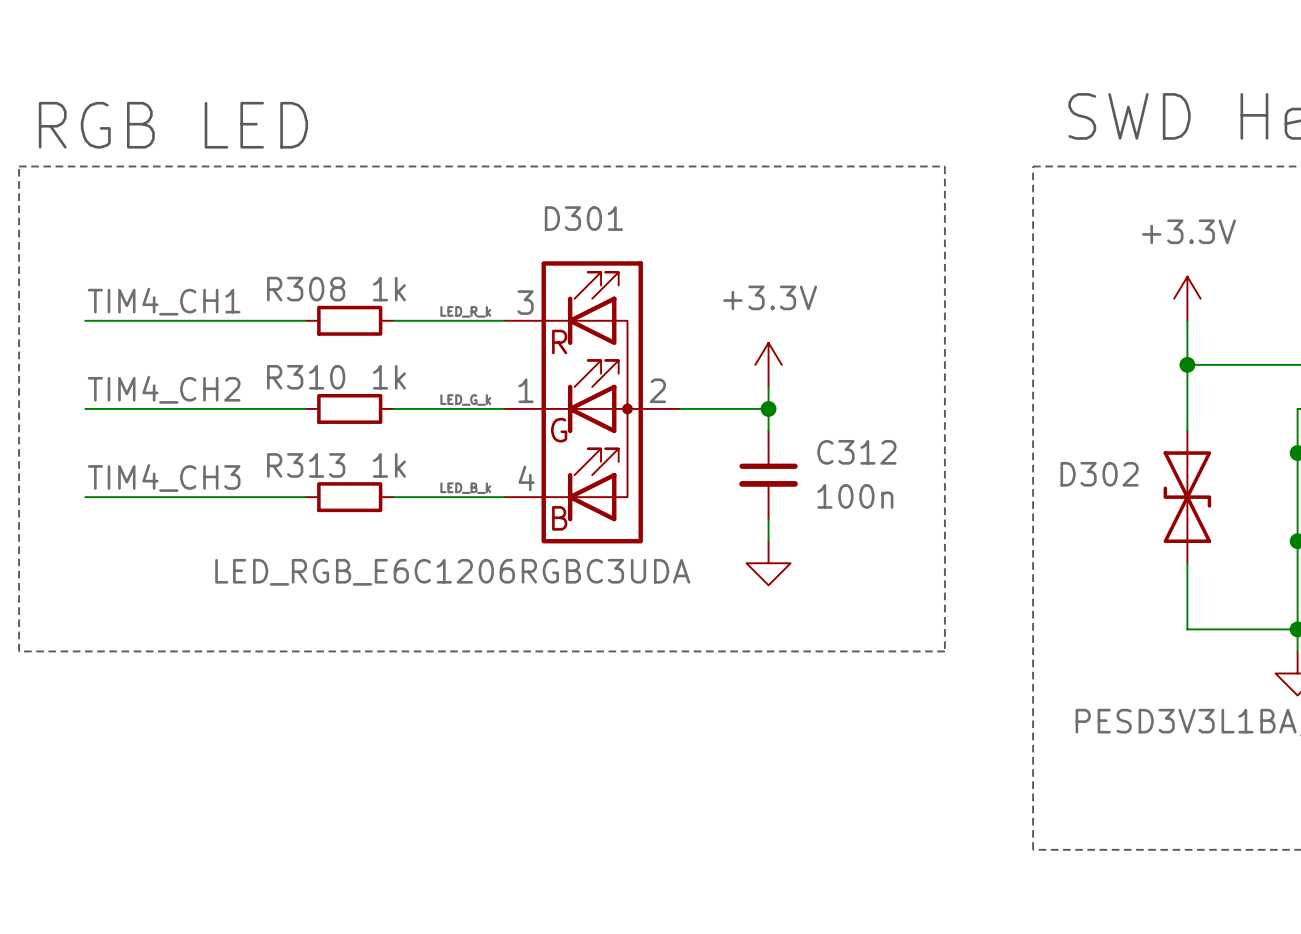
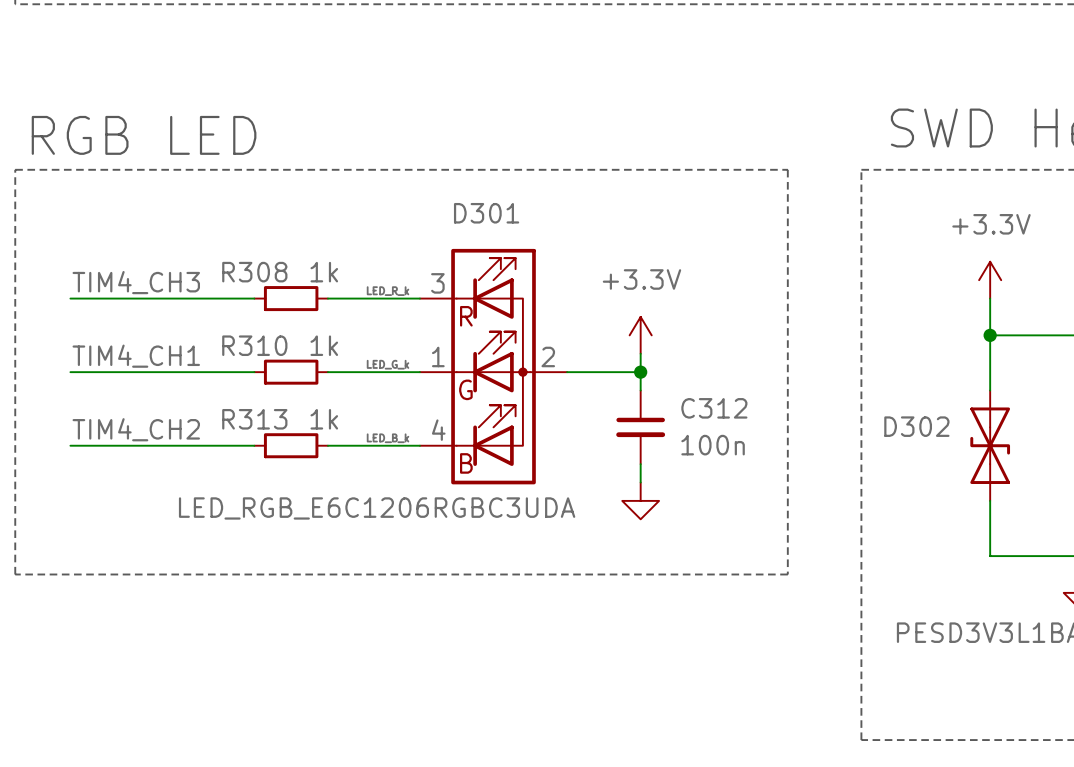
label: TIM4_CH1 (164, 301) -> TIM4_CH3 (136, 282)
label: TIM4_CH2 (164, 389) -> TIM4_CH1 (136, 356)
label: TIM4_CH3 (164, 477) -> TIM4_CH2 (136, 429)

